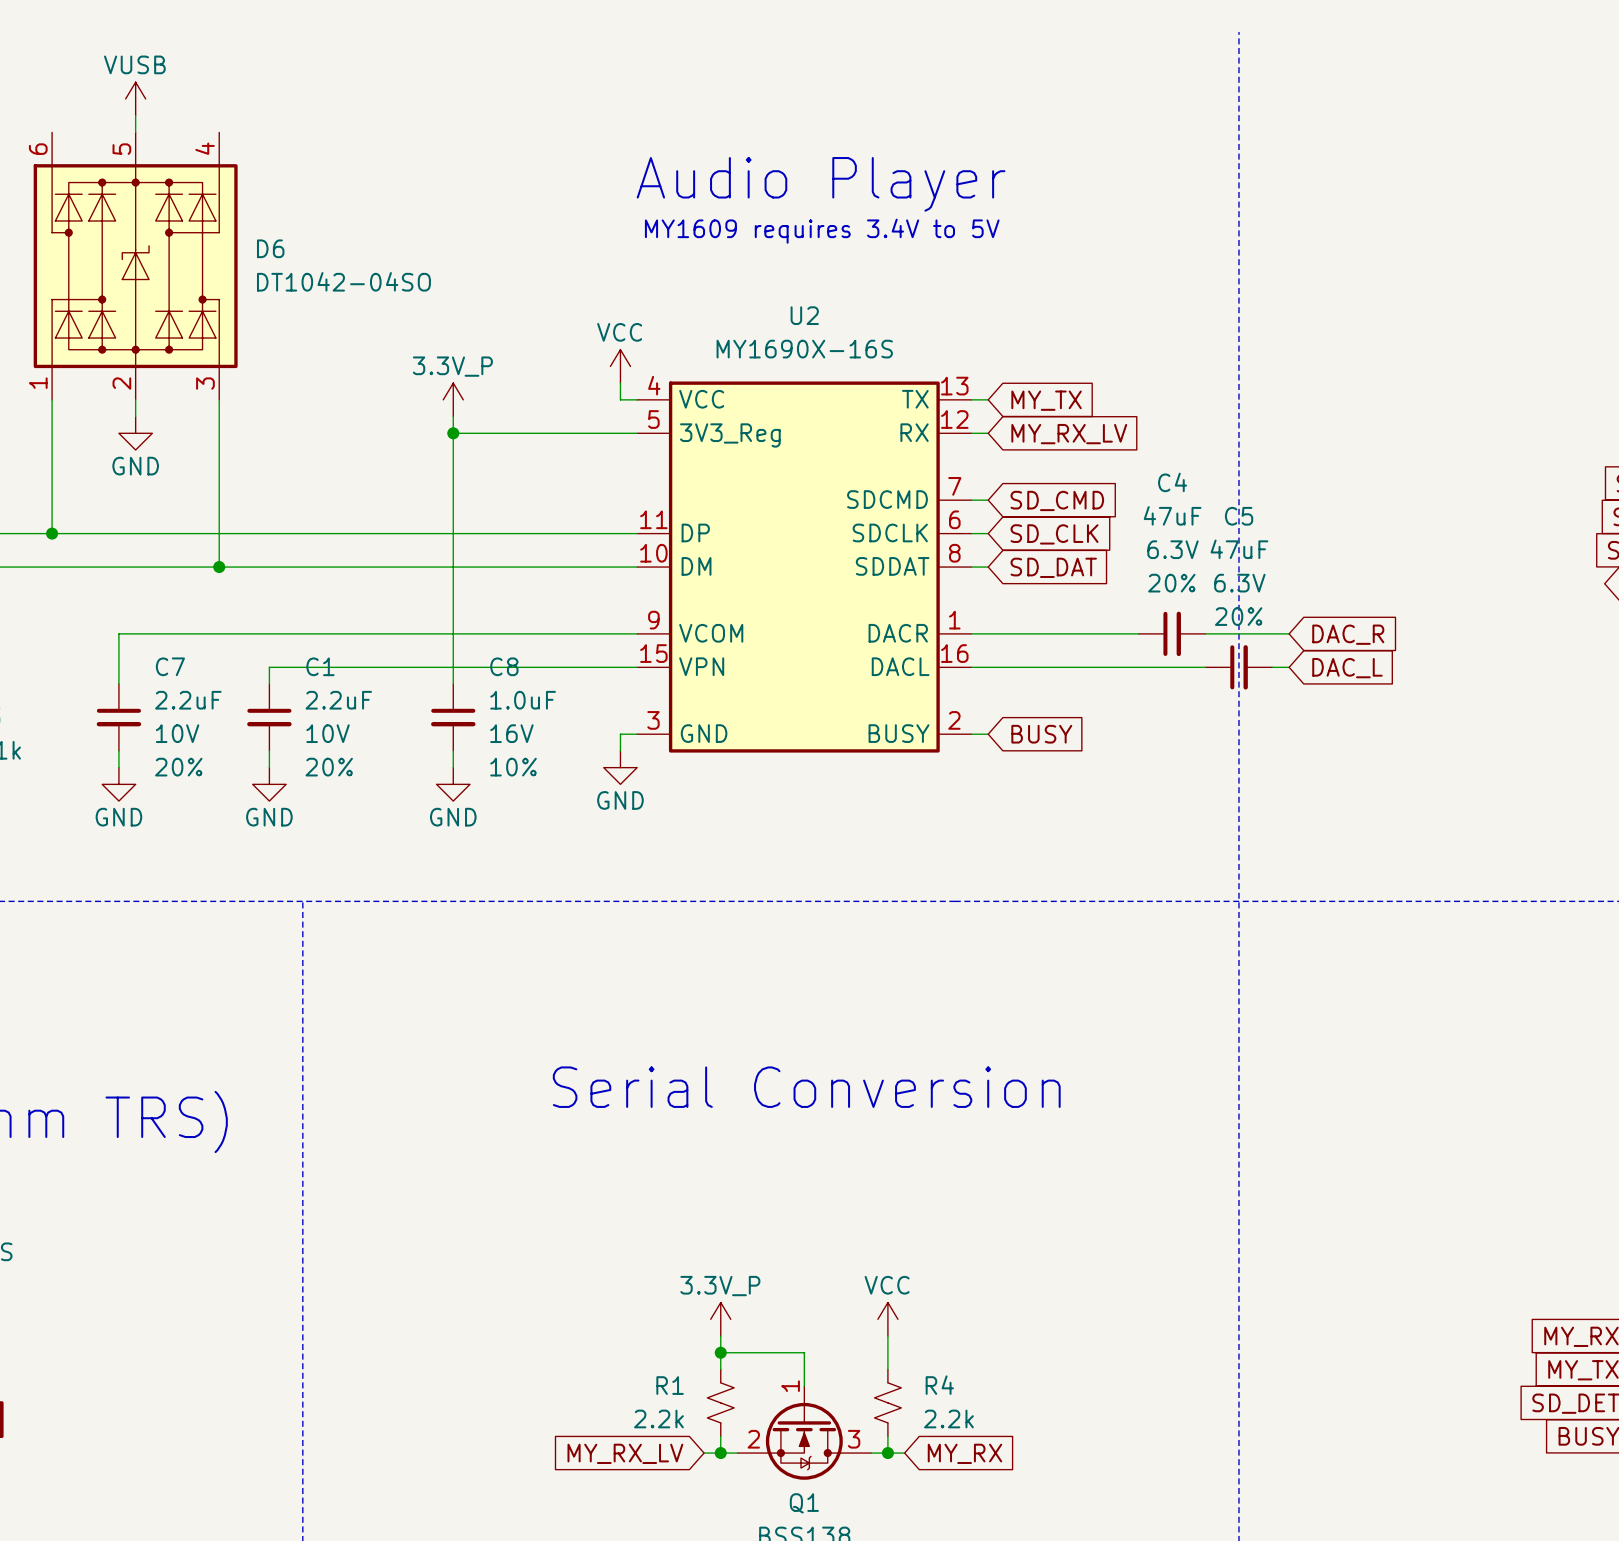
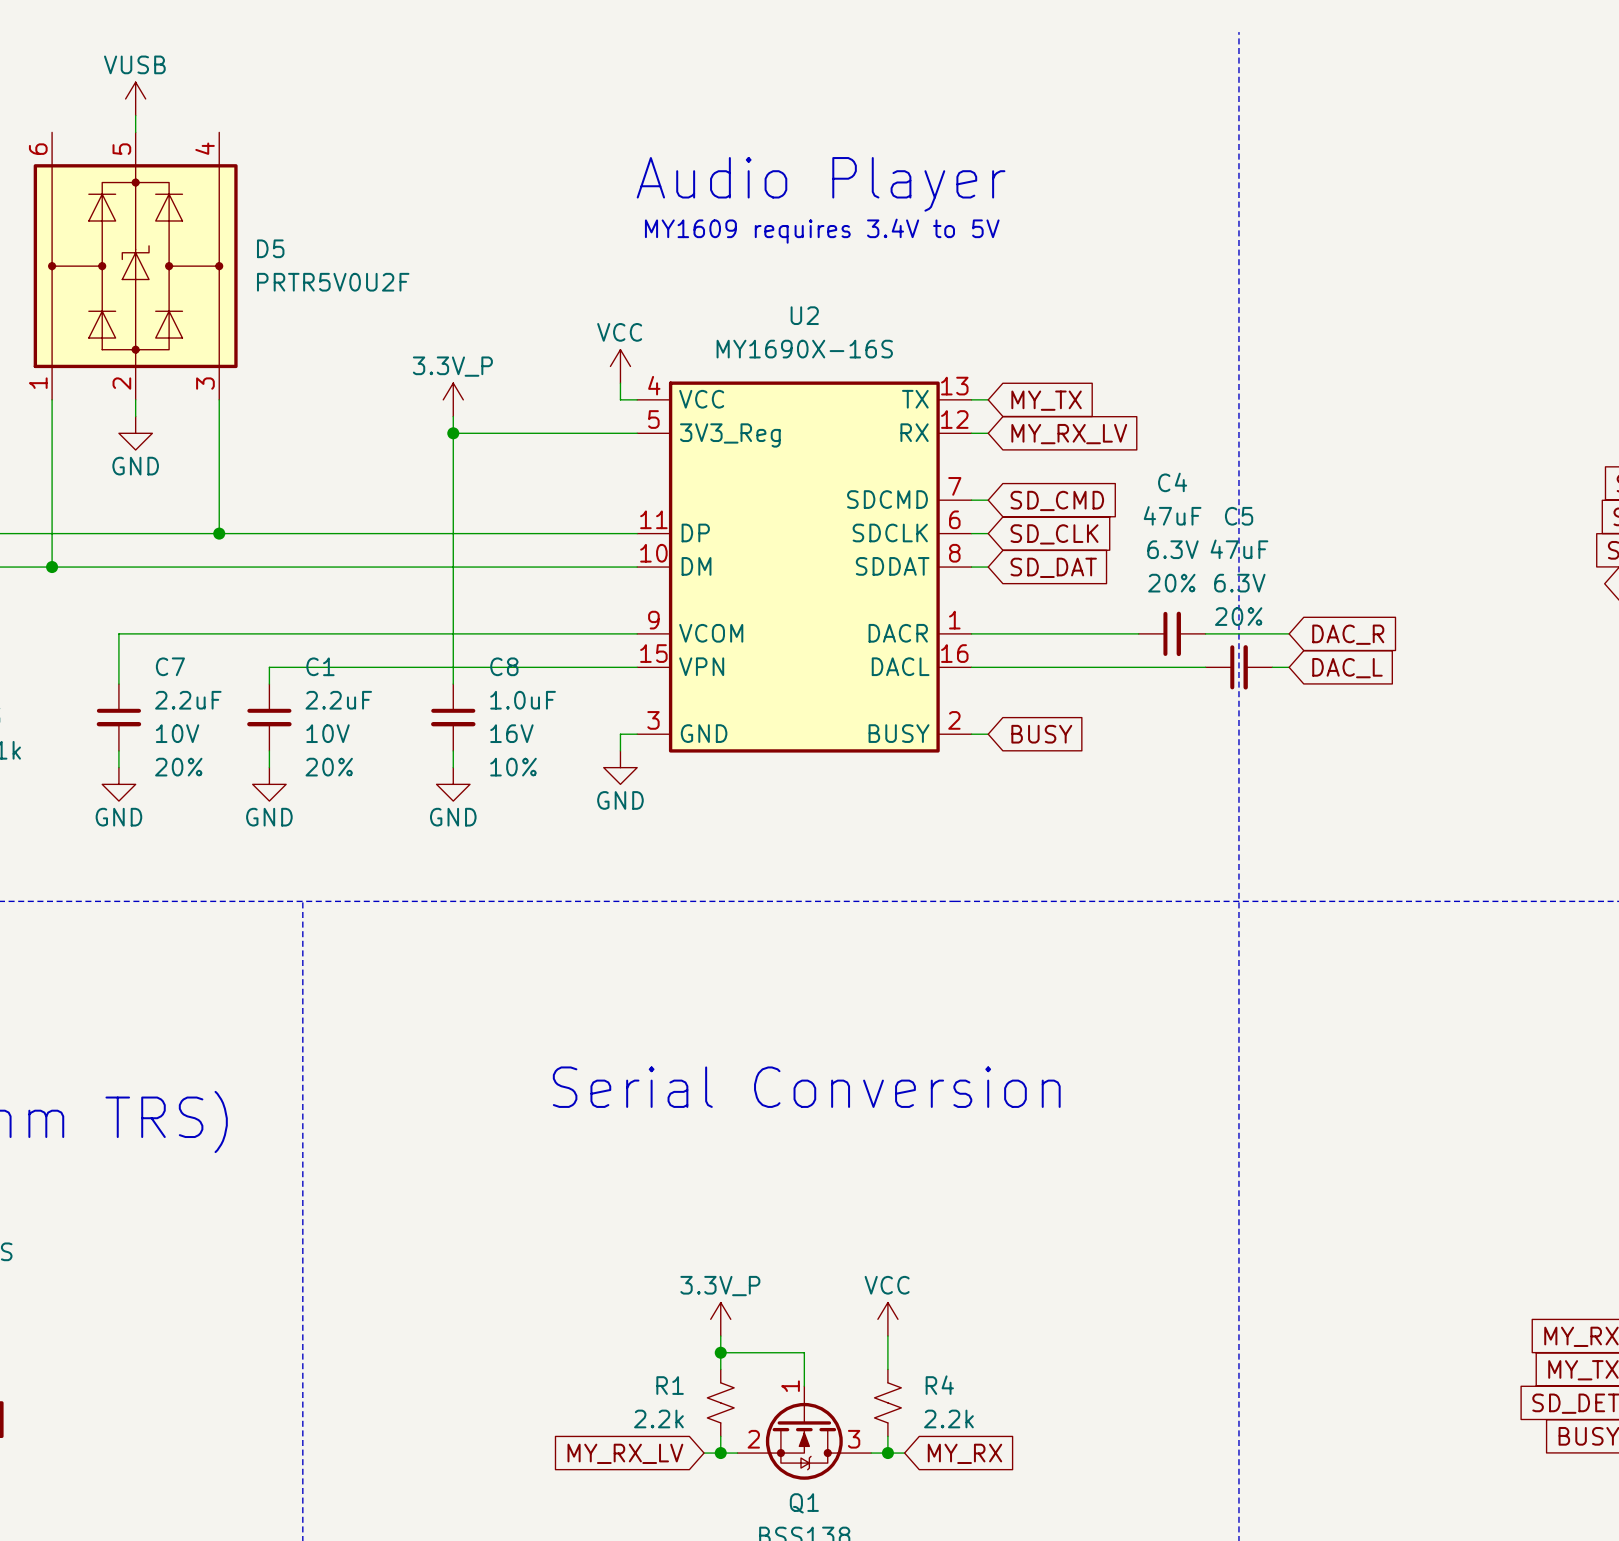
D6: DT1042-04SO (135, 266) -> none
D5: none -> PRTR5V0U2F (135, 266)
junction position: (52, 533) -> (52, 567)
wire: (219, 533) (219, 567) -> (52, 533) (52, 567)
junction position: (219, 567) -> (219, 533)

